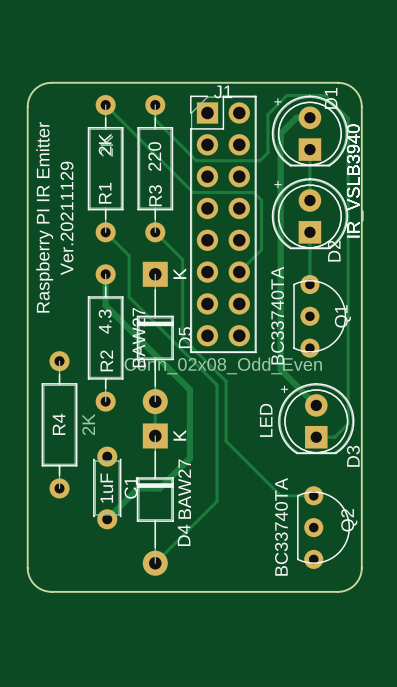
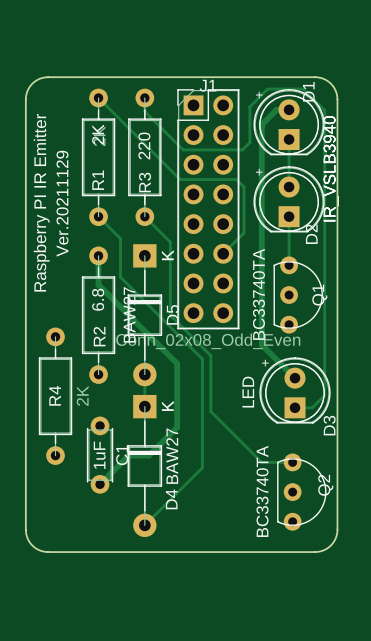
R2 value: 4.3 (105, 321) -> 6.8 (98, 299)

